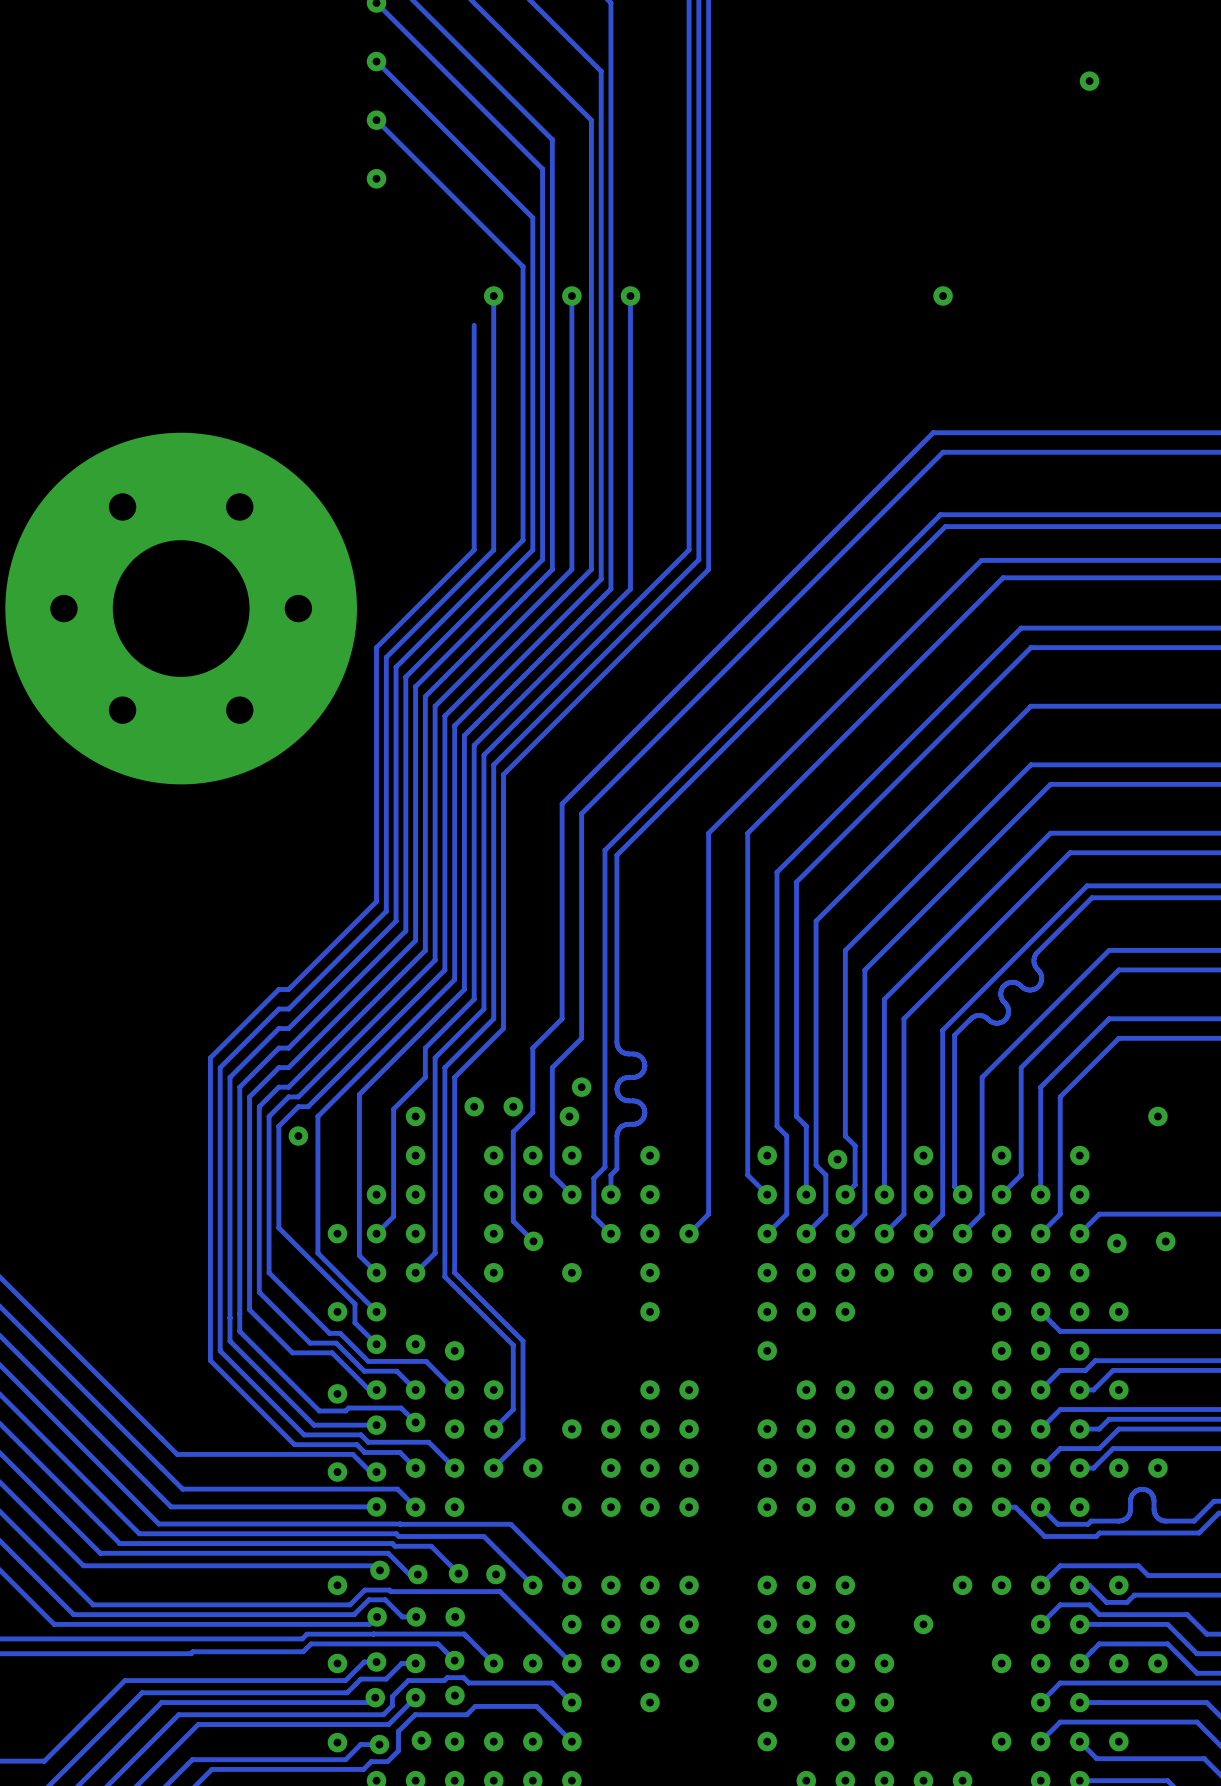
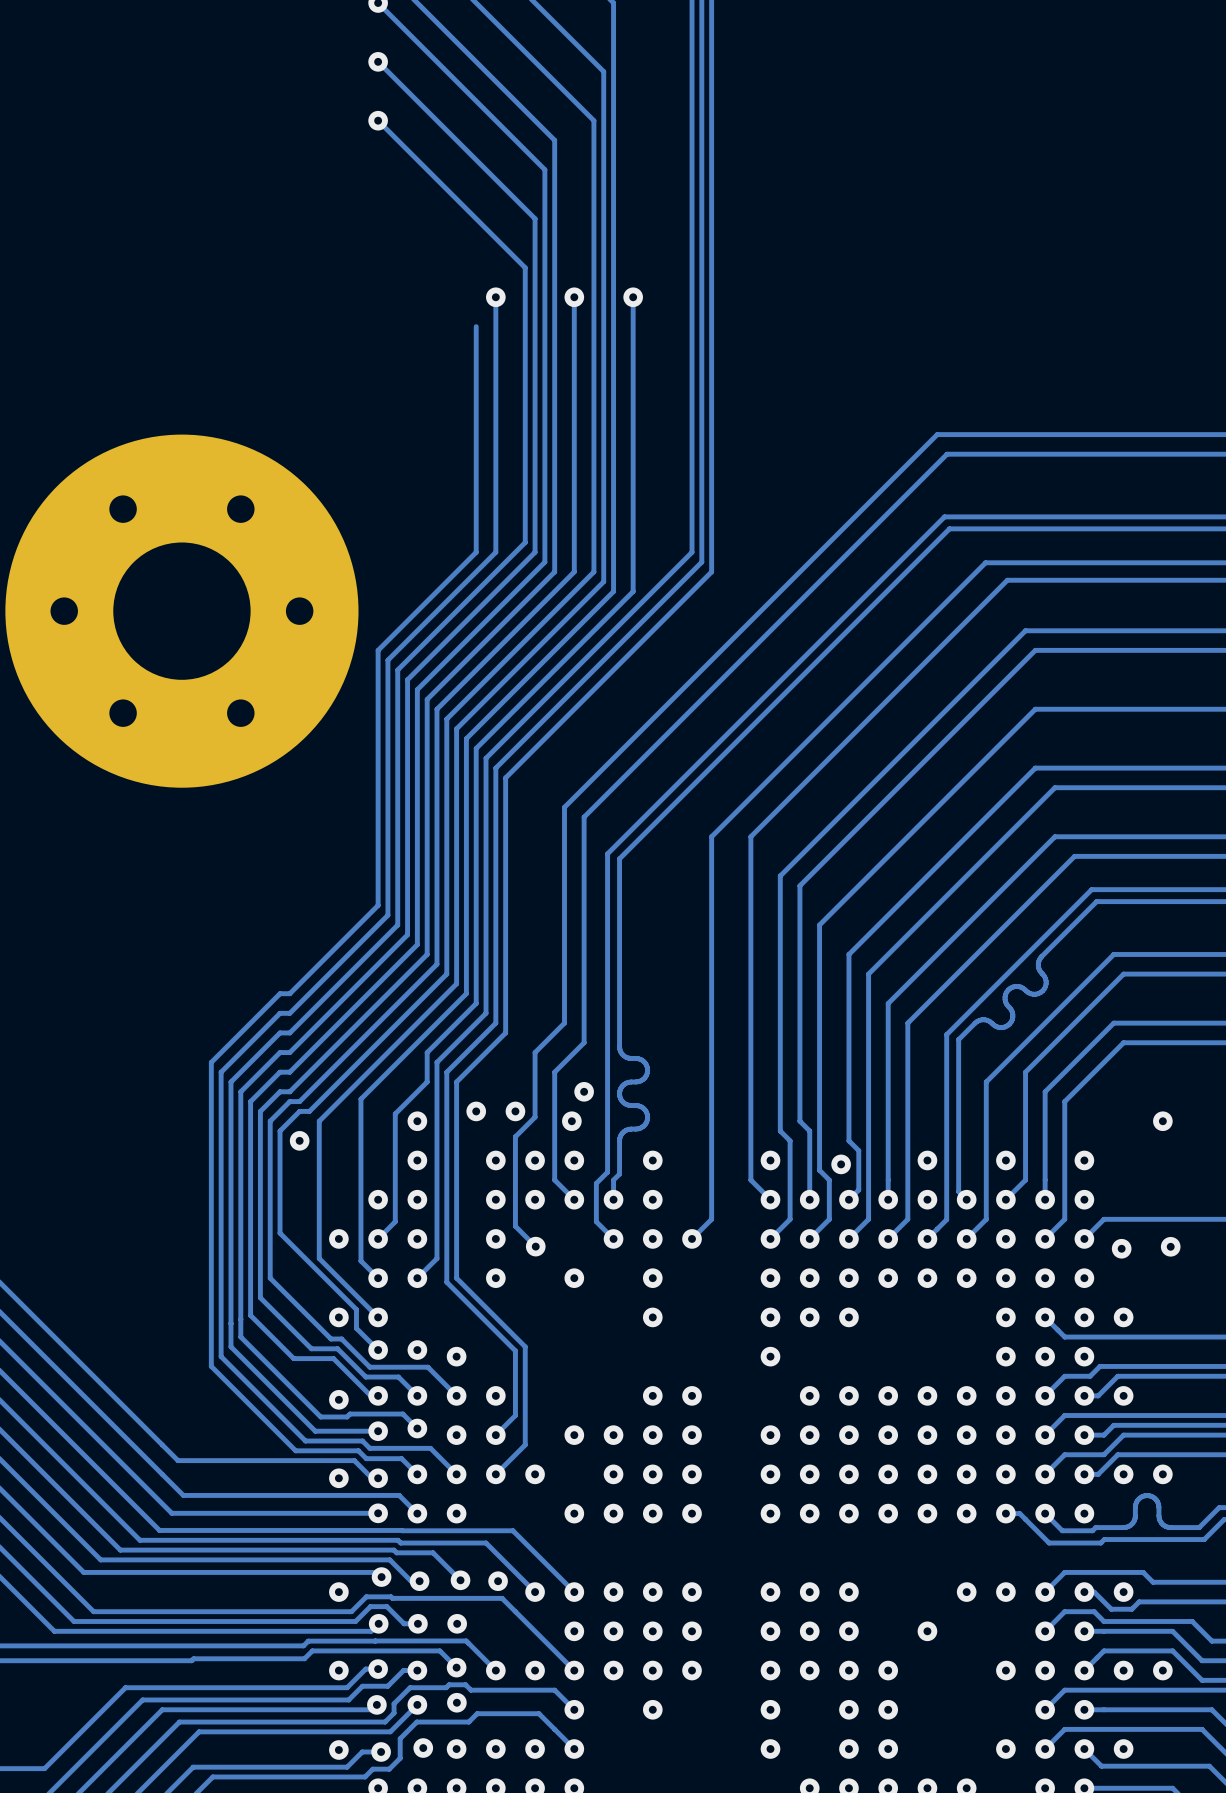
via: (1089, 81) -> none
via: (376, 178) -> none
via: (943, 296) -> none

